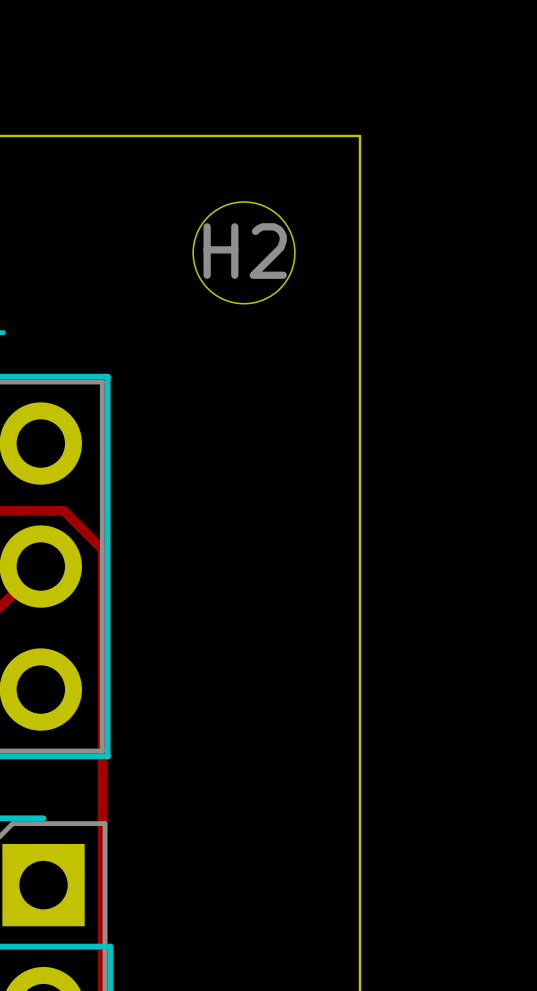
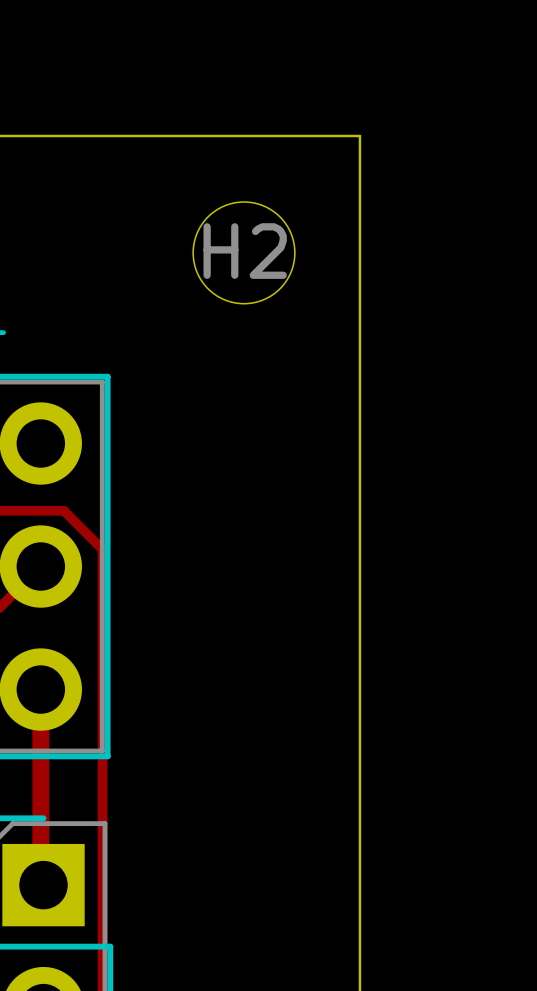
track: none -> (40, 689) (40, 882) (43, 885)

